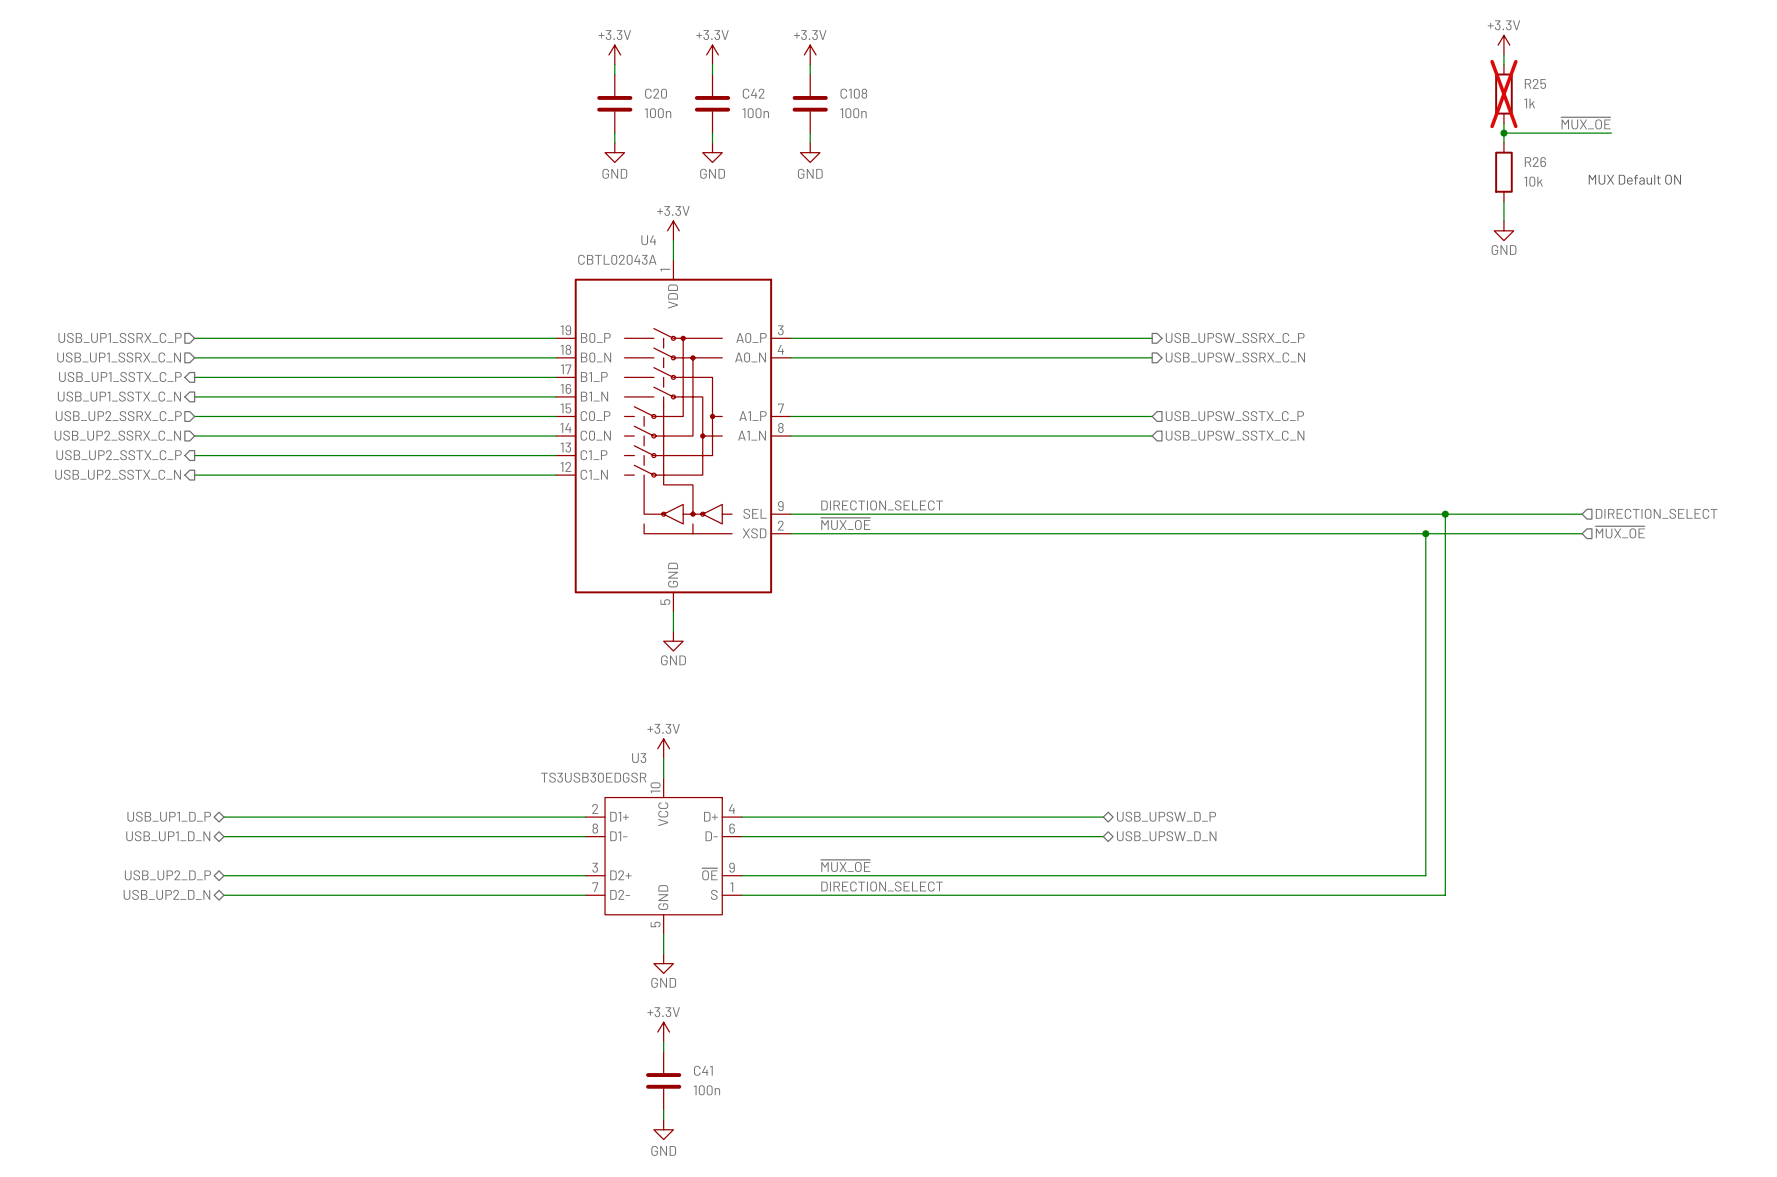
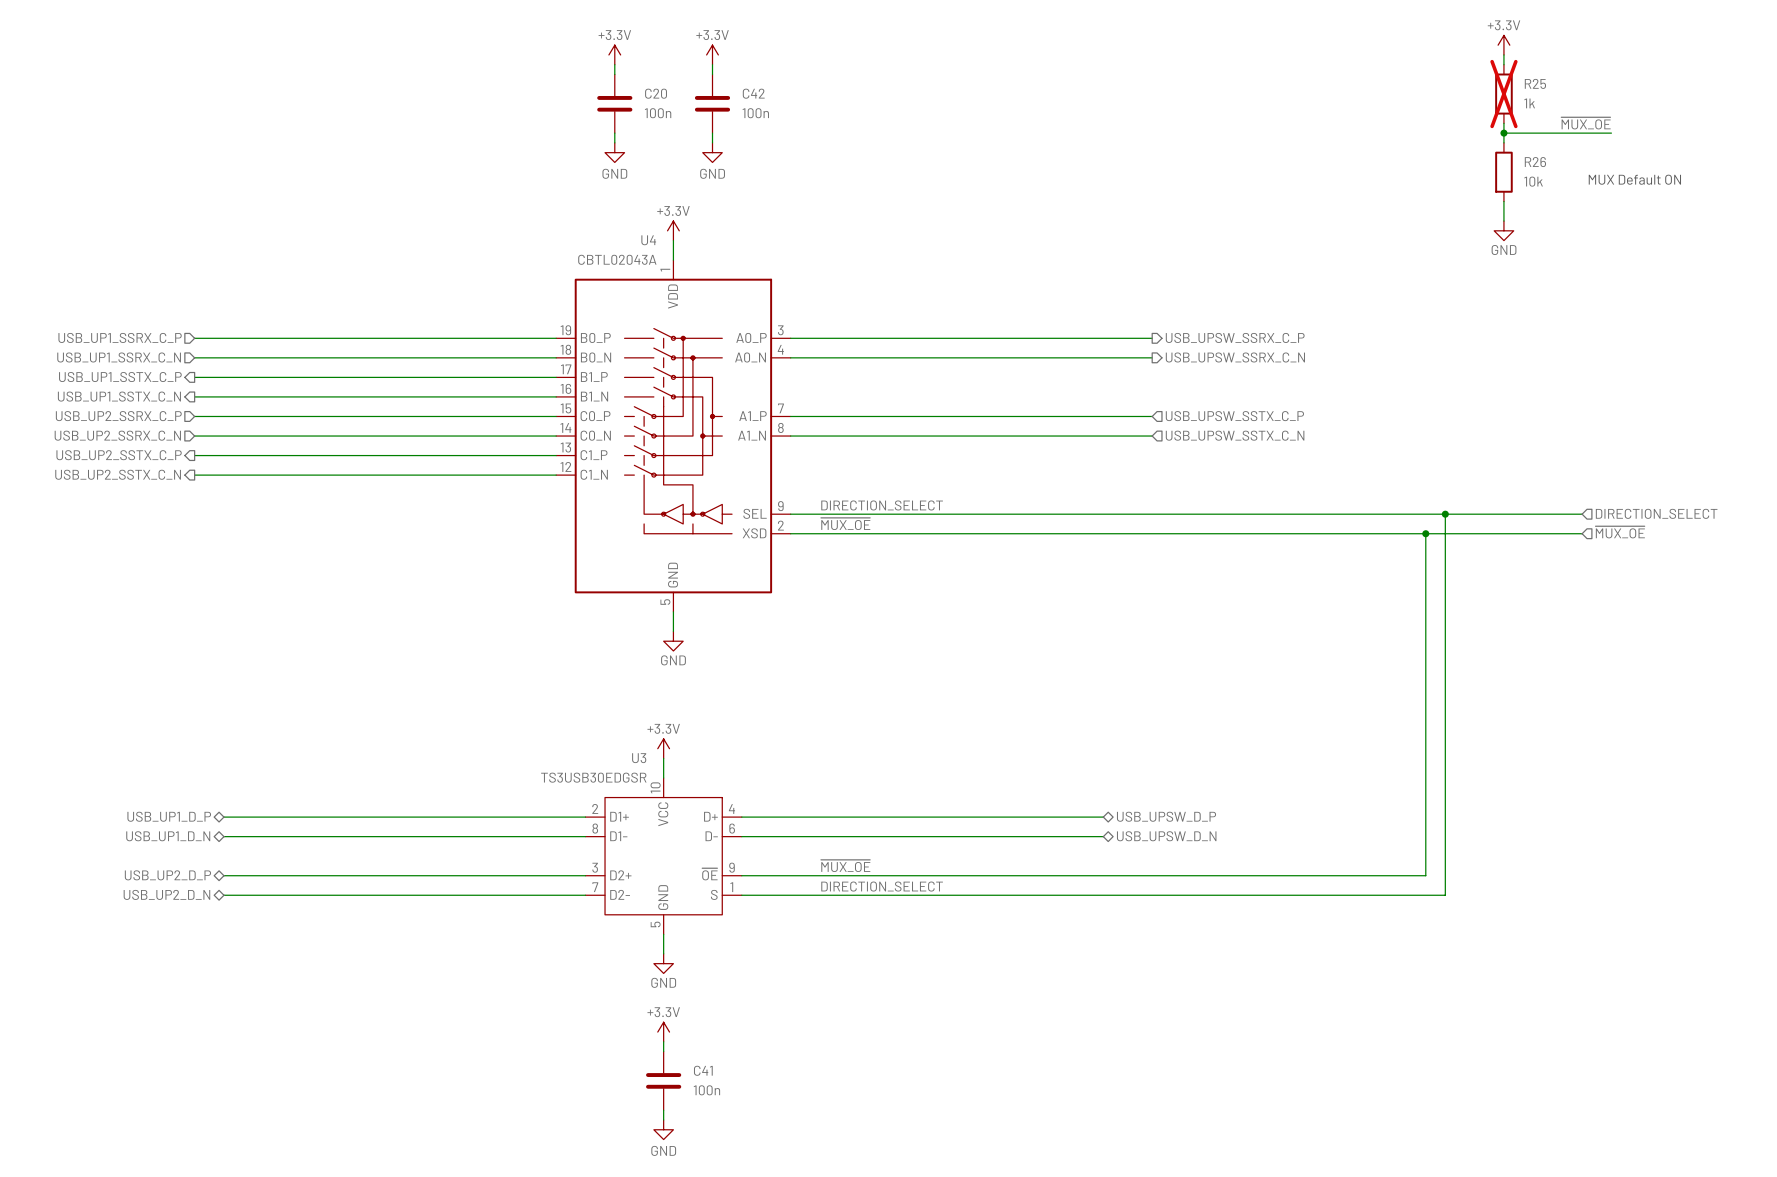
power symbol: +3.3V (810, 54) -> none
wire: (810, 64) (810, 74) -> none
C108: 100n (810, 103) -> none
wire: (810, 133) (810, 142) -> none
power symbol: GND (810, 152) -> none

